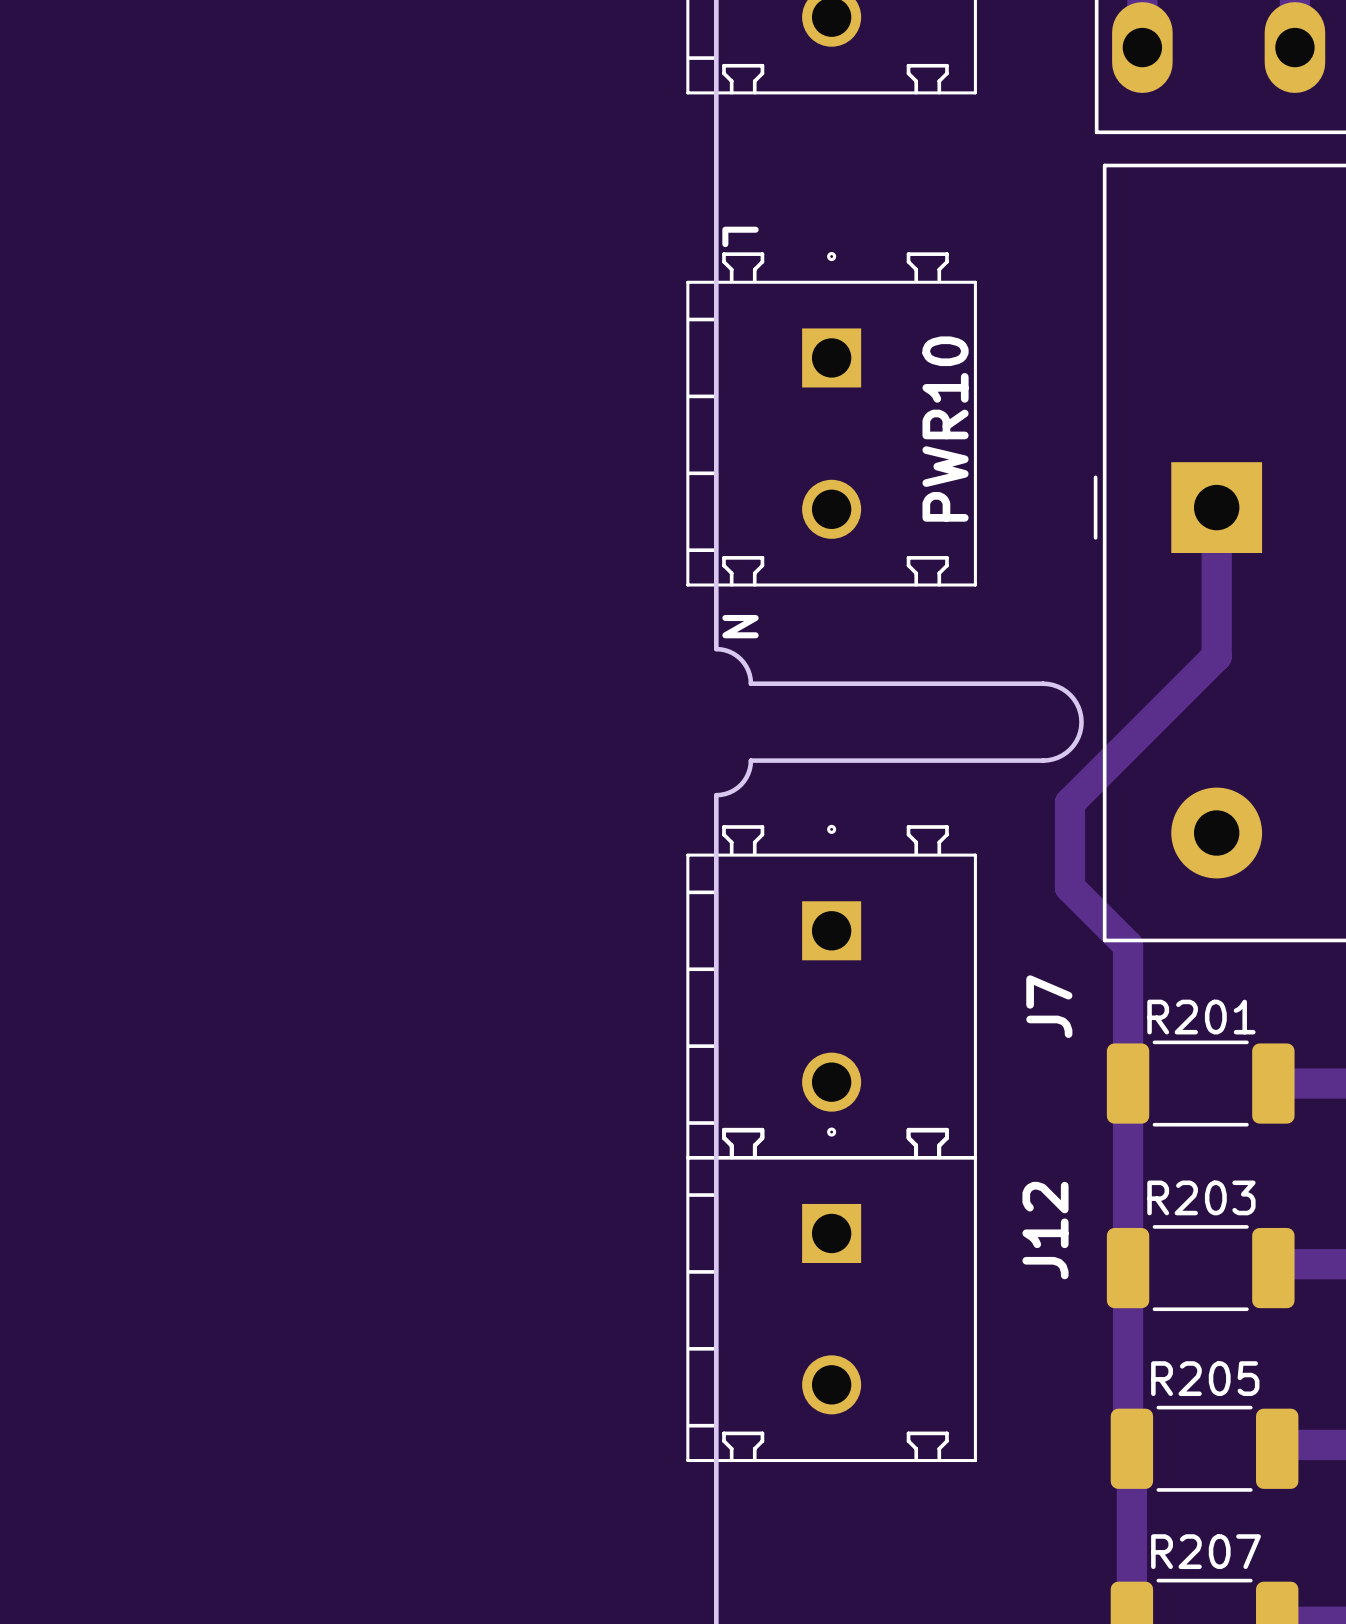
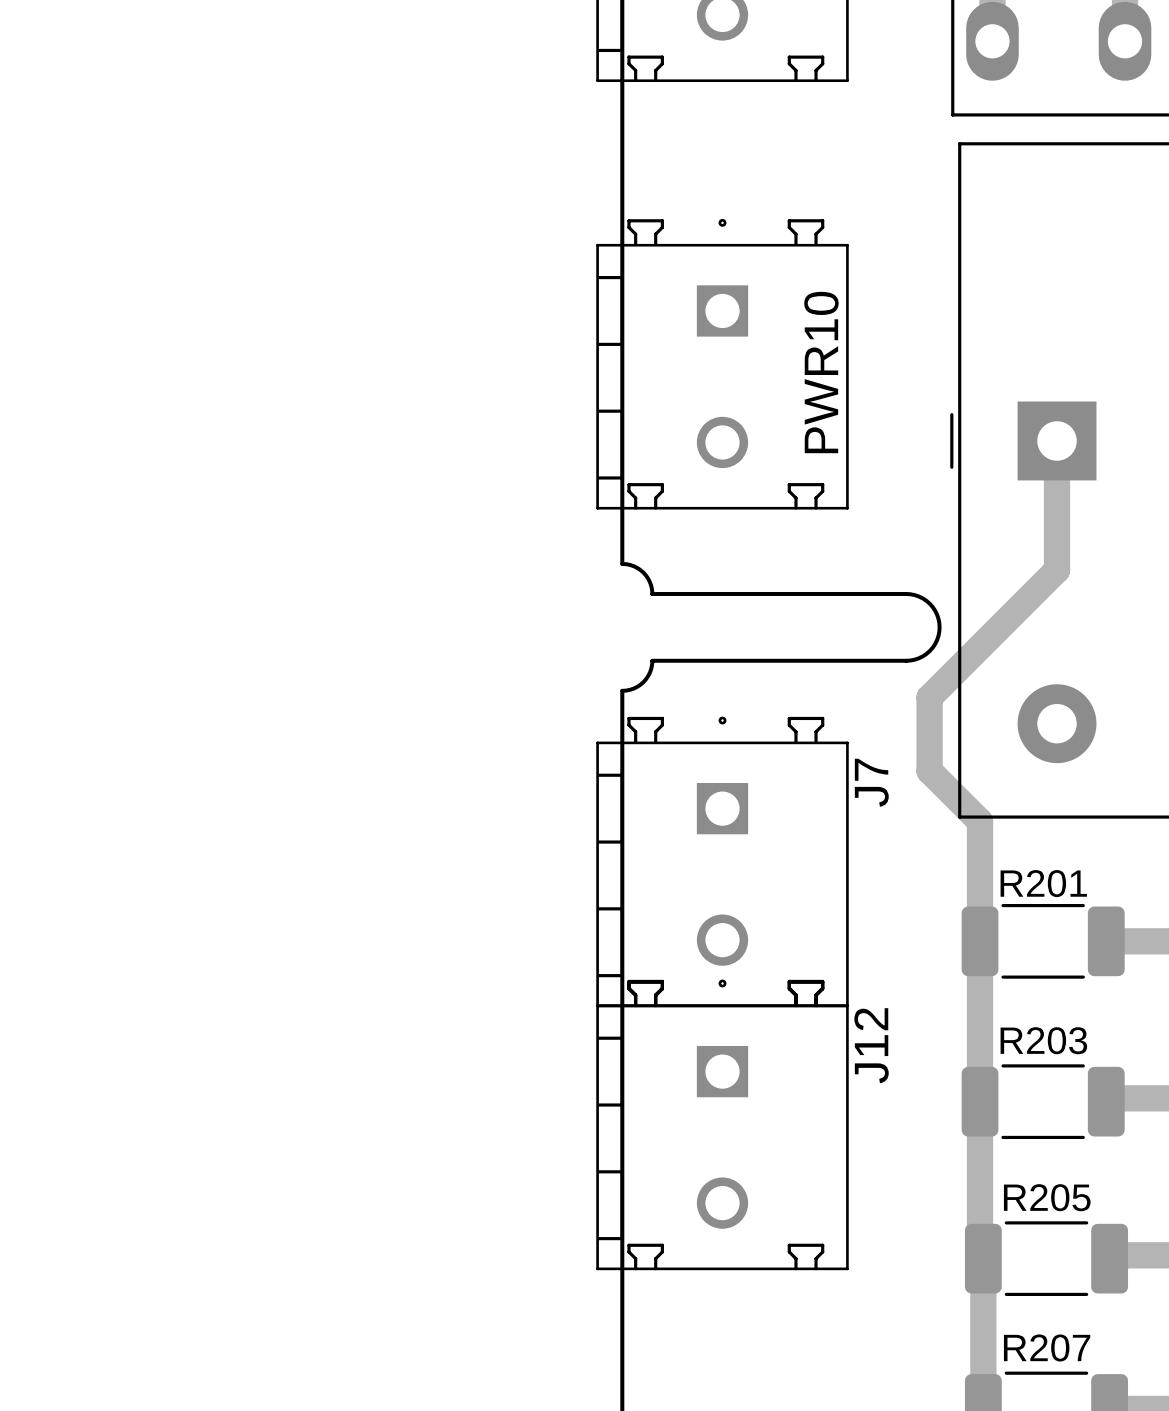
text: L (740, 236) -> none
text: N (740, 626) -> none
J7 name position: J7 (1049, 1006) -> J7 (871, 782)
J12 name position: J12 (1045, 1230) -> J12 (871, 1045)

